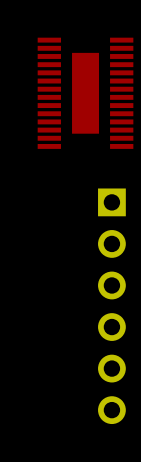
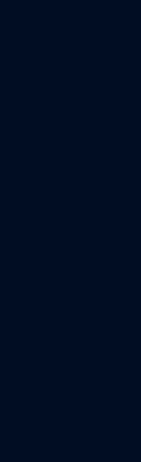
part: (85, 93) -> none
part: (111, 306) -> none

